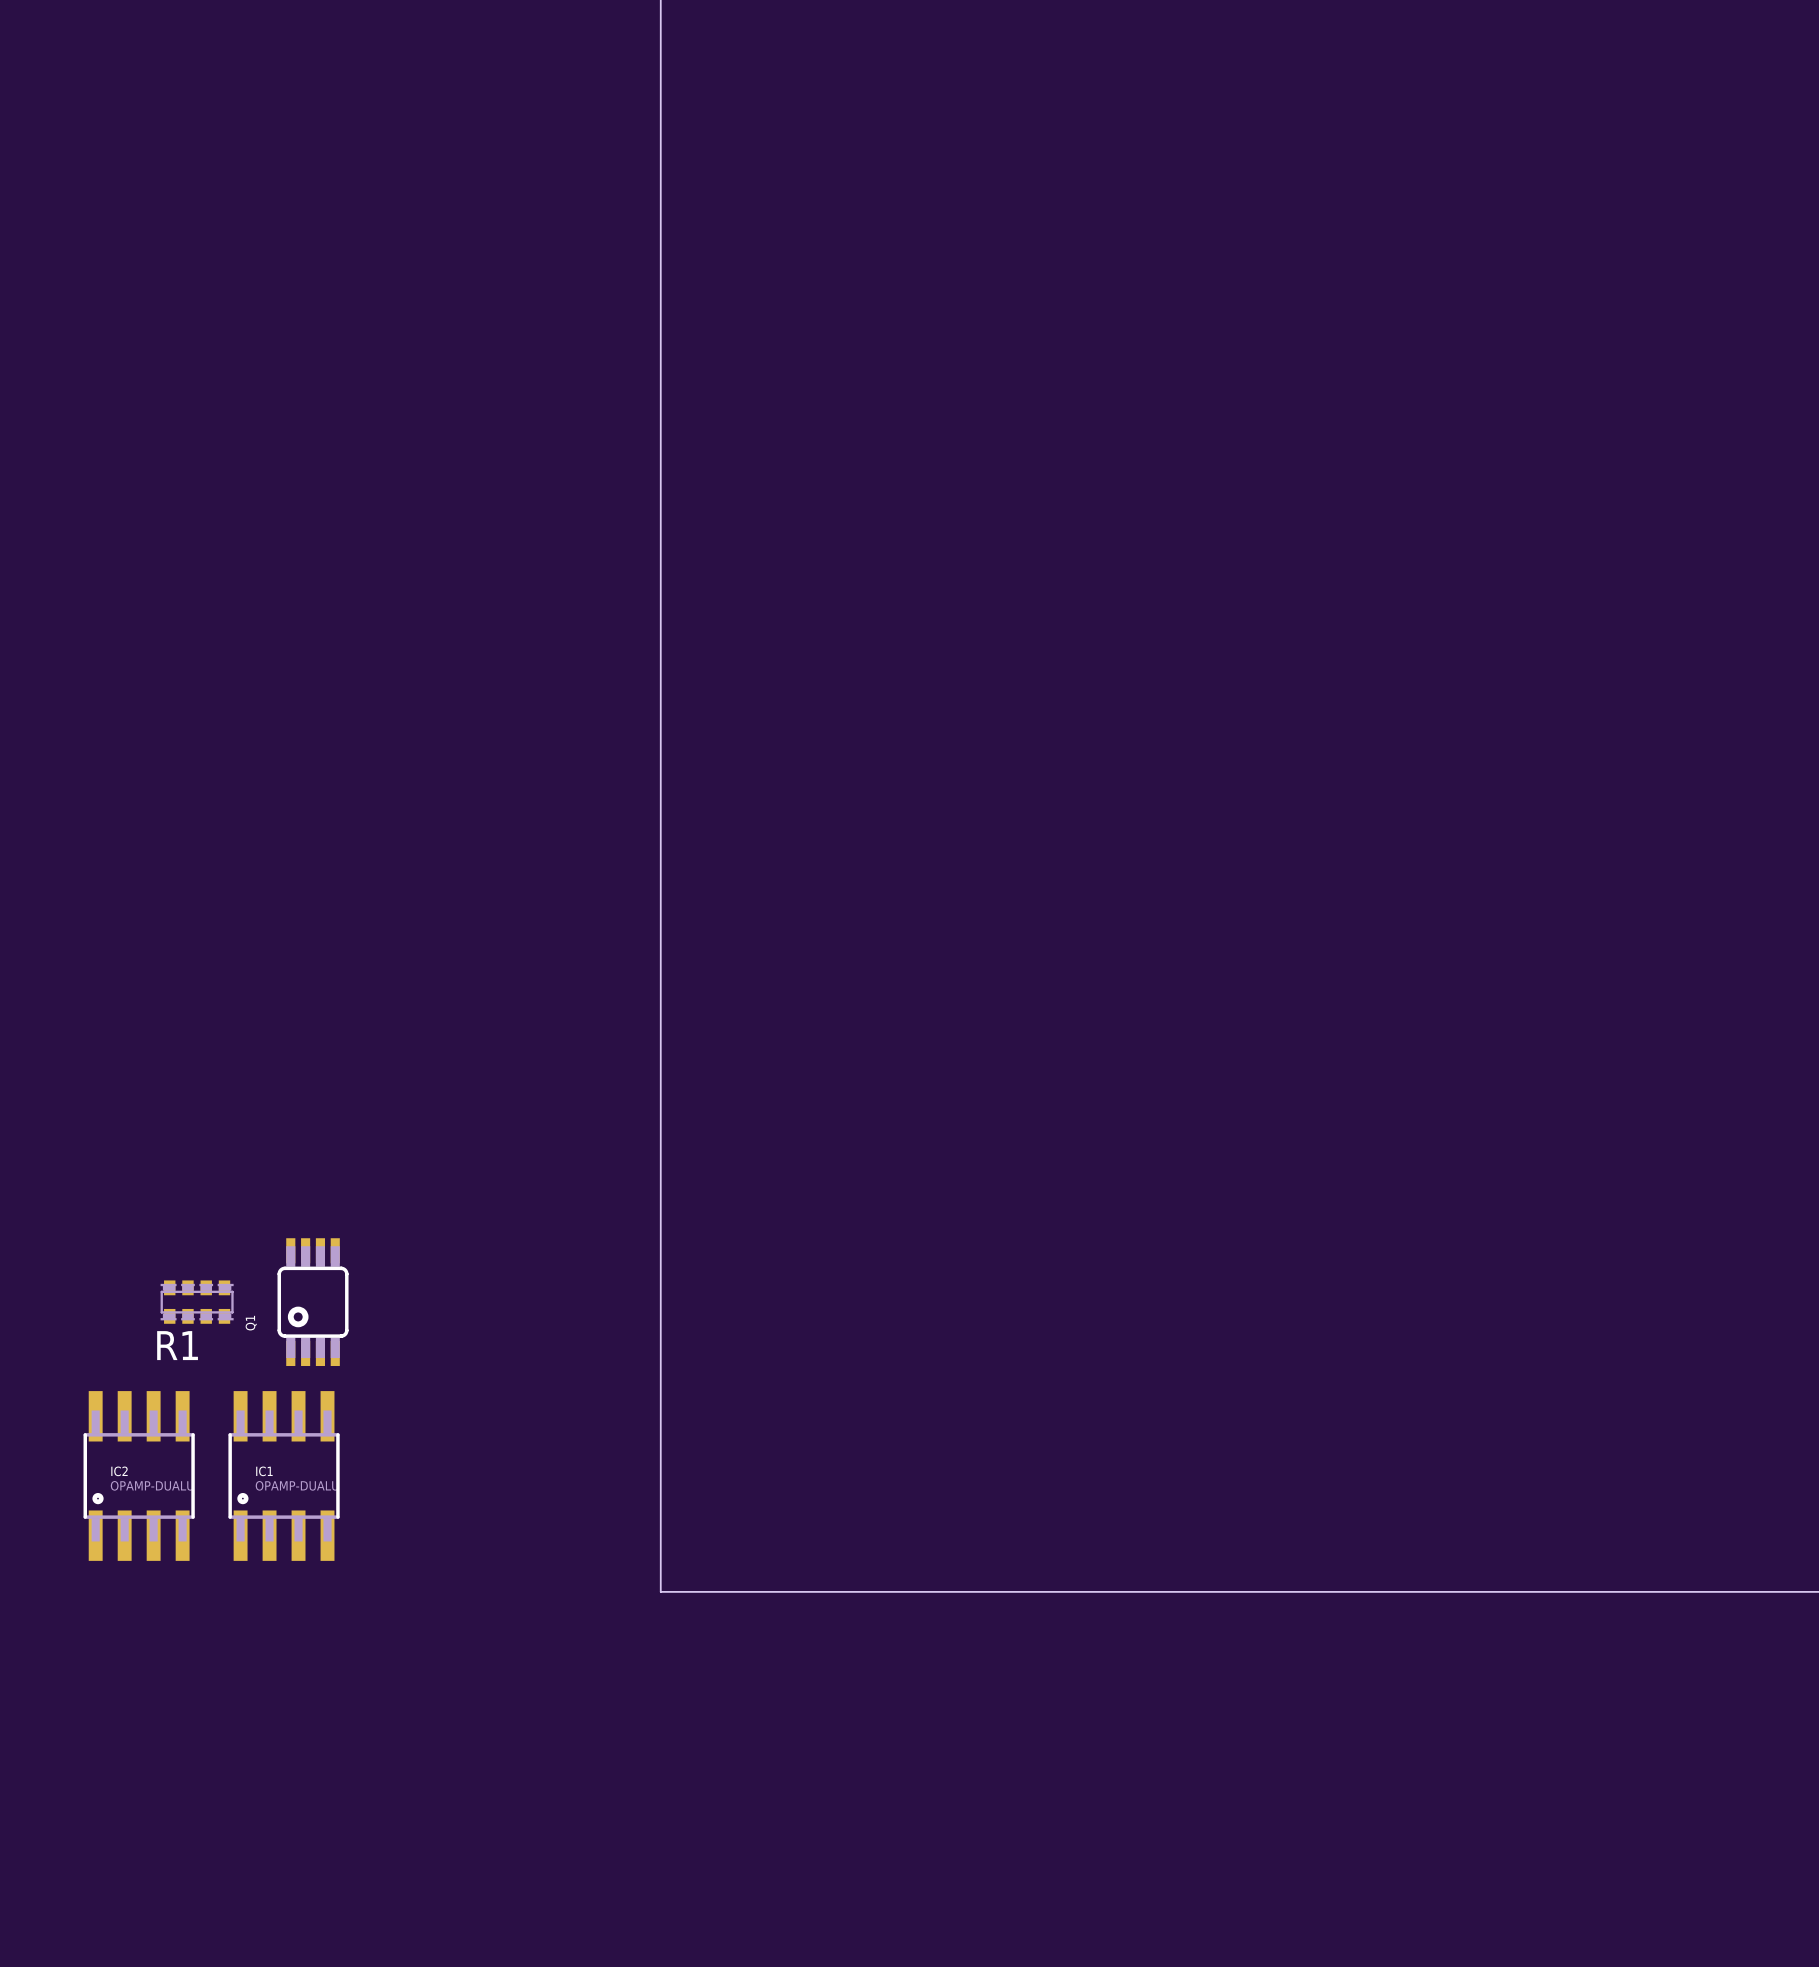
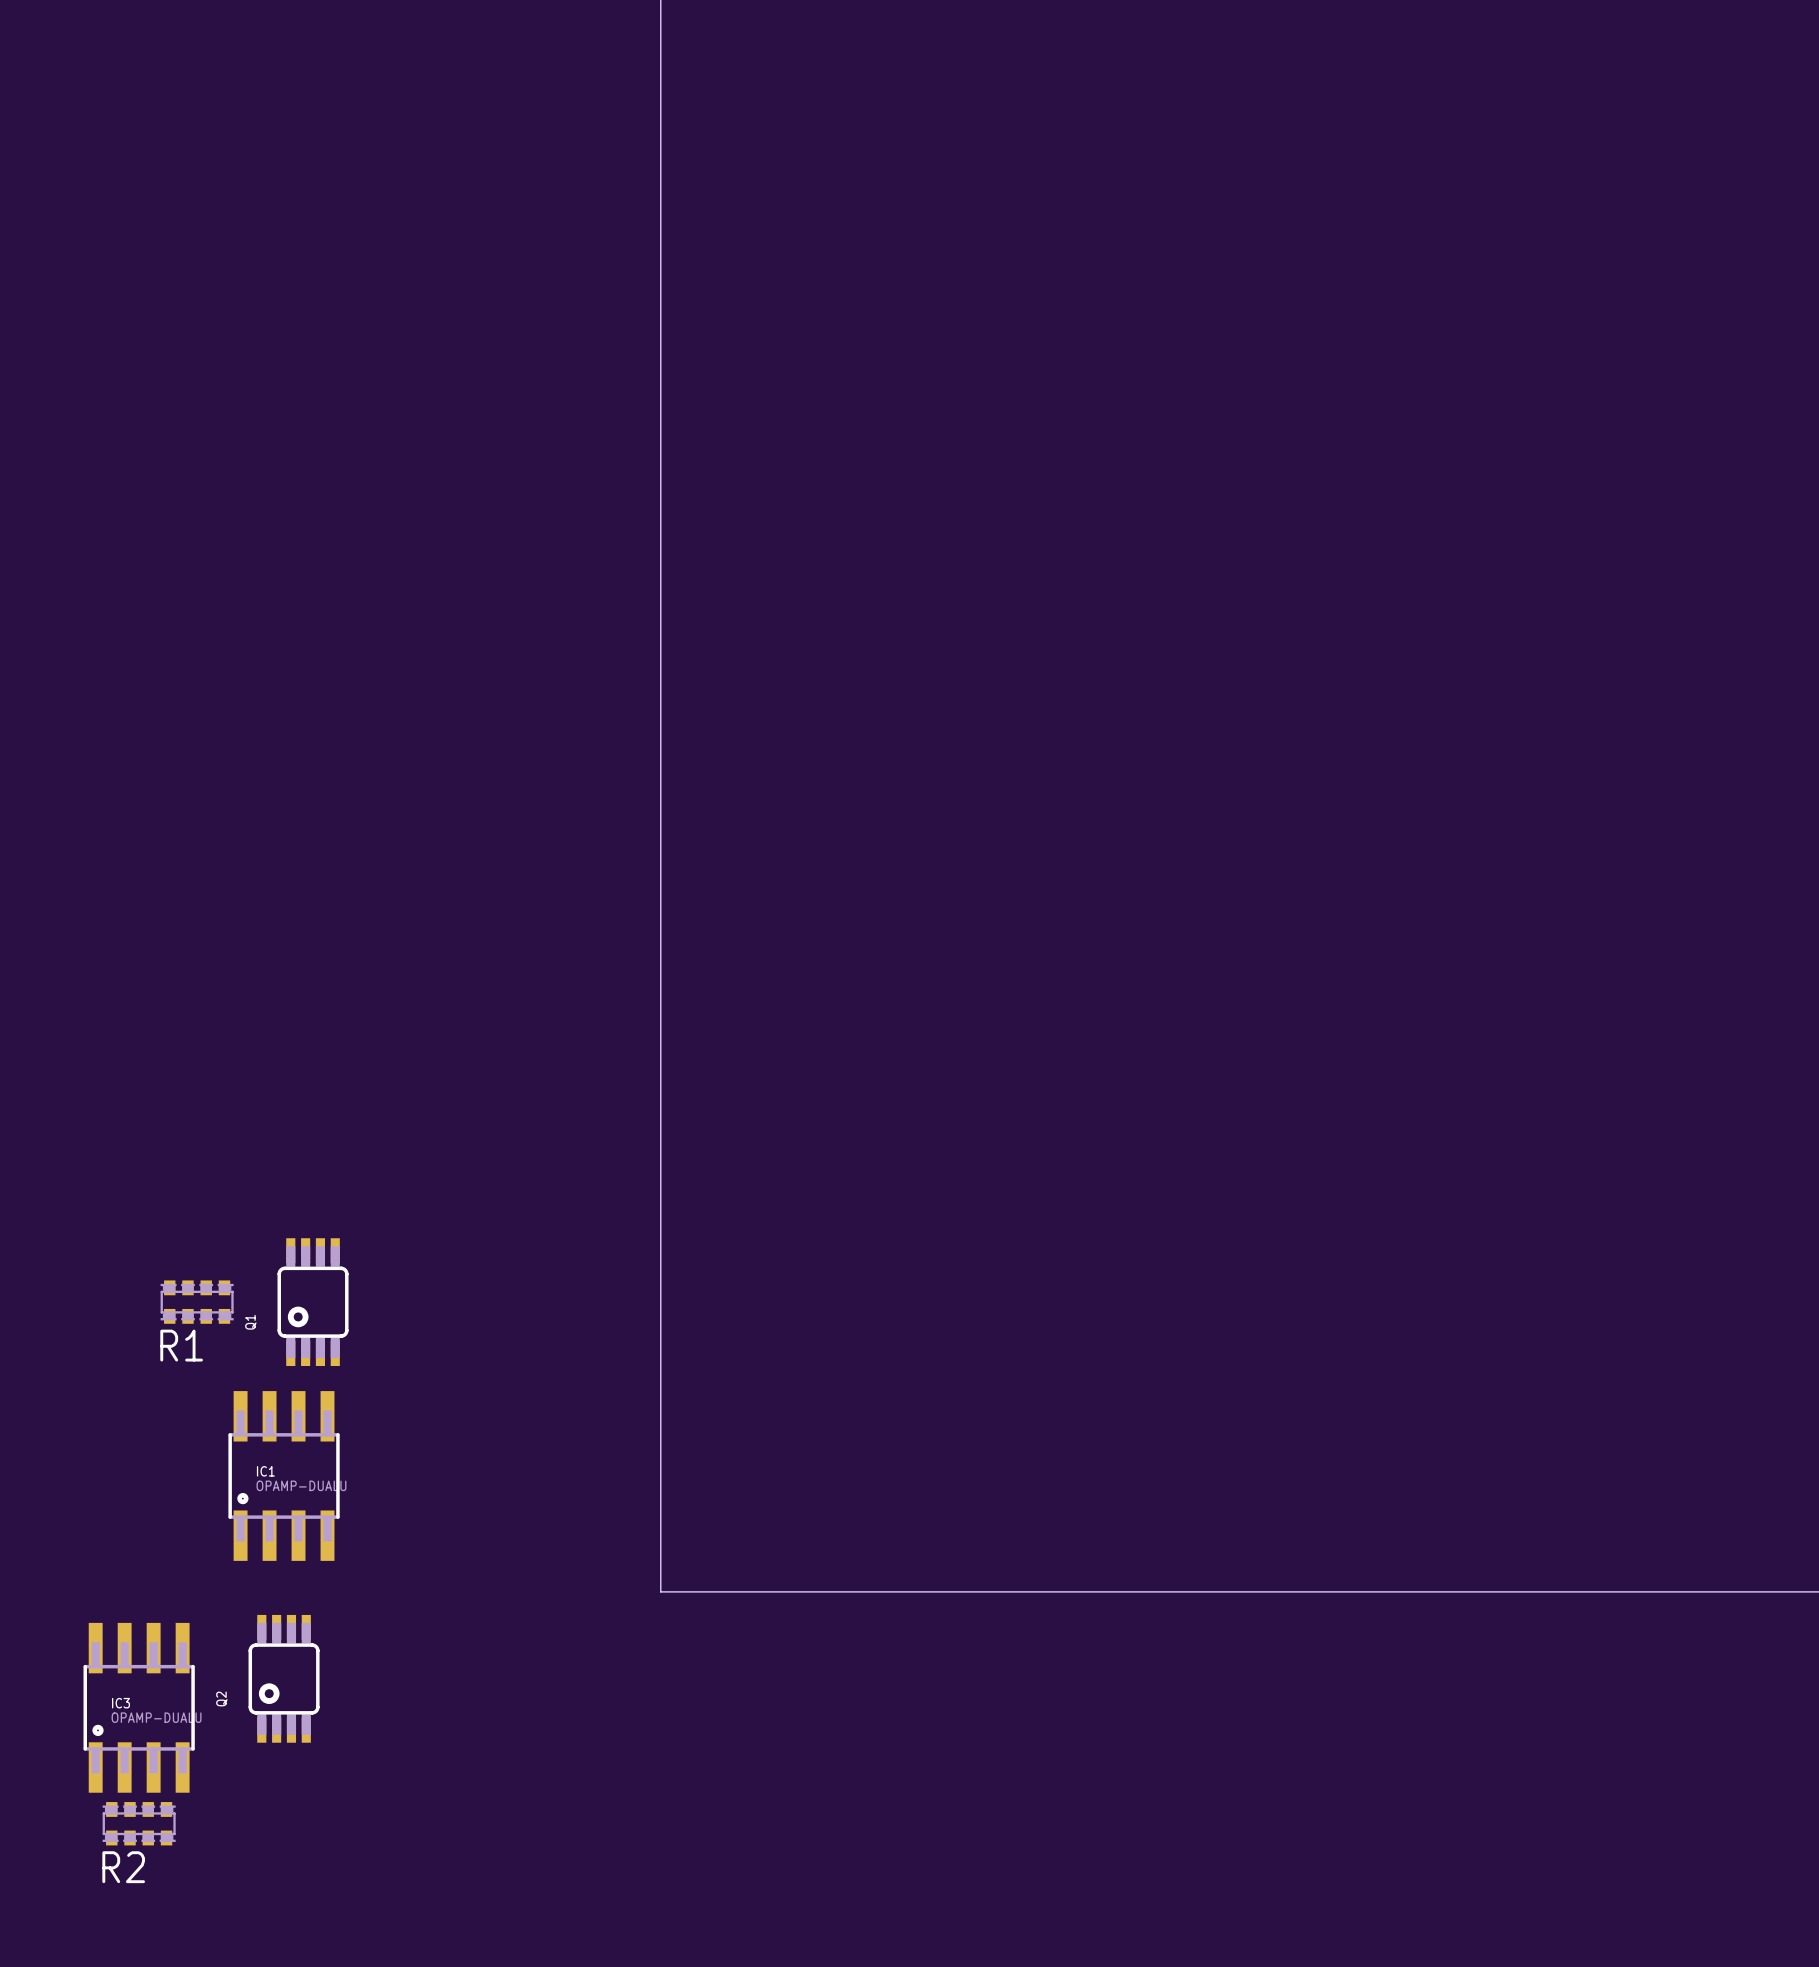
IC2: OPAMP-DUALU (139, 1475) -> none
Q2: none -> (284, 1678)
IC3: none -> OPAMP-DUALU (139, 1707)
R2: none -> (139, 1823)

